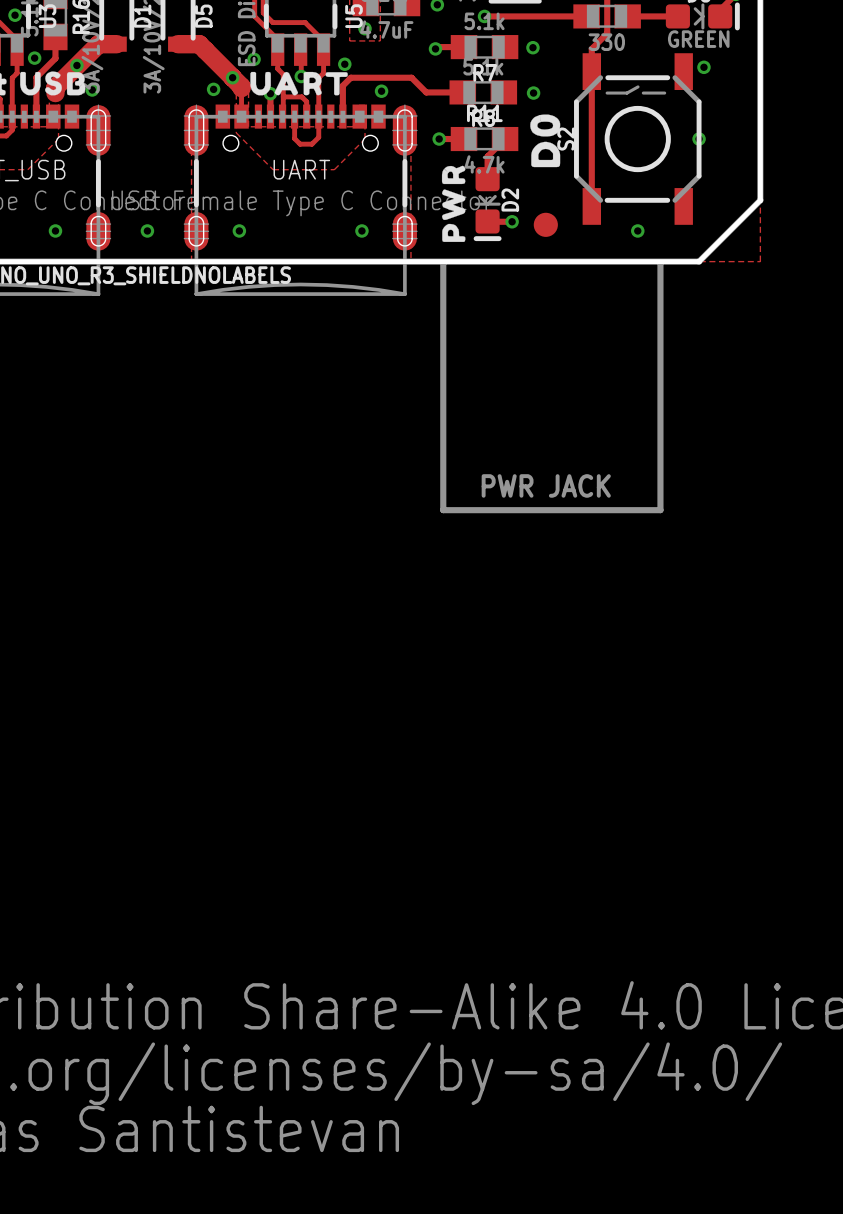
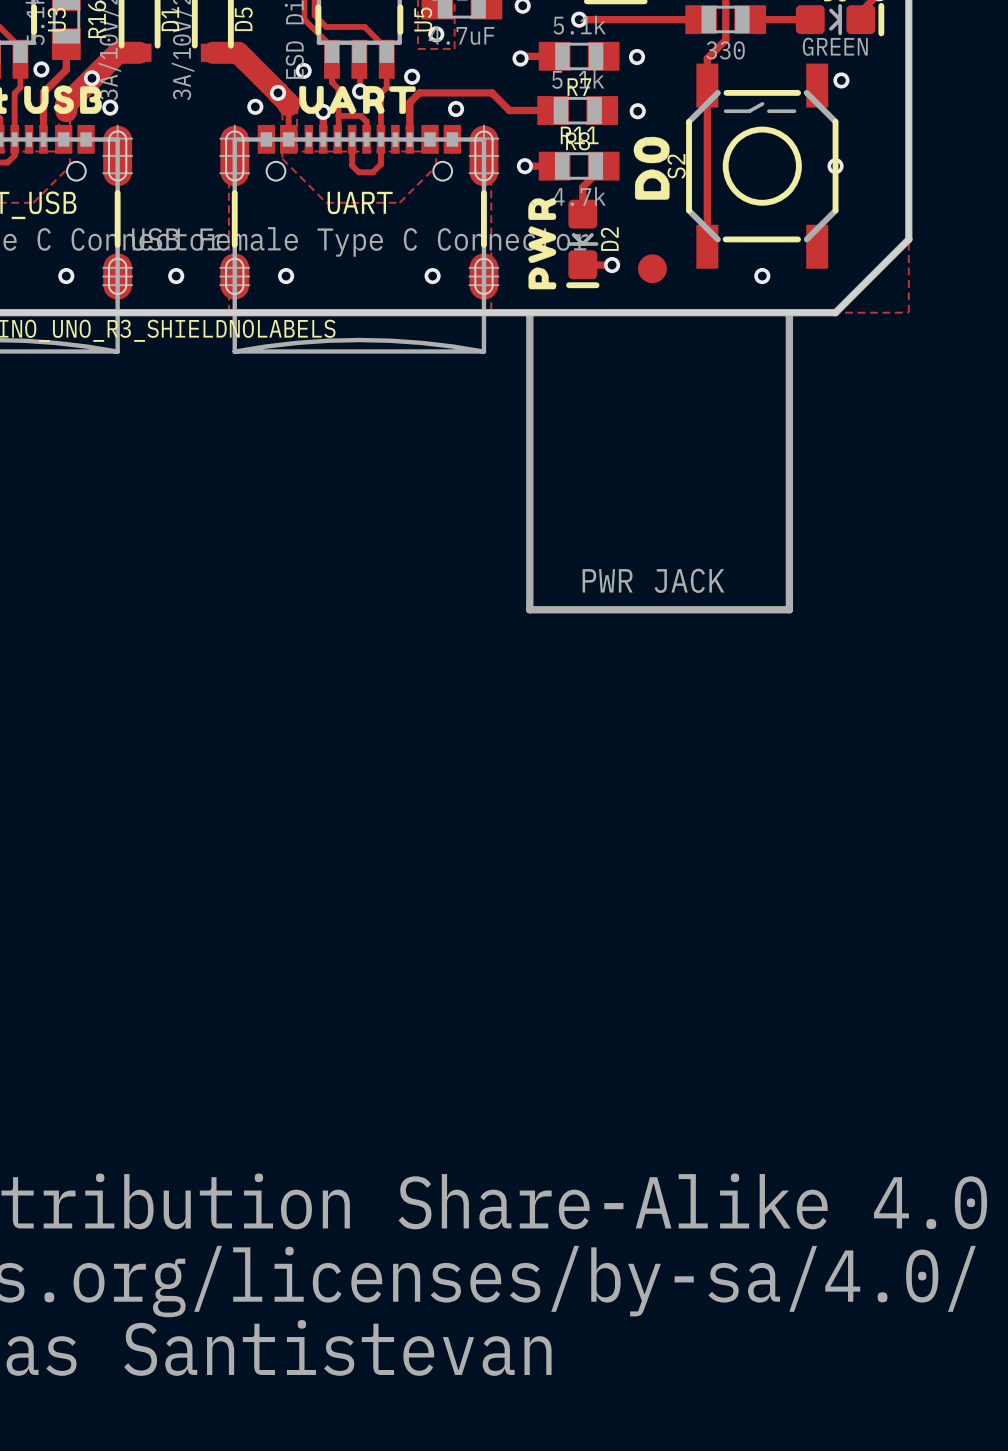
via: (15, 15) -> none

